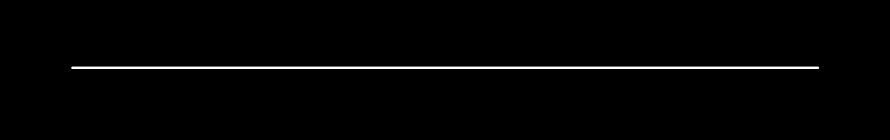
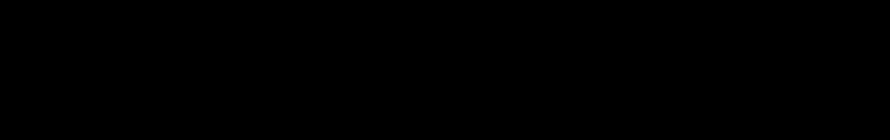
board edge: (72, 67) (817, 67) -> none

